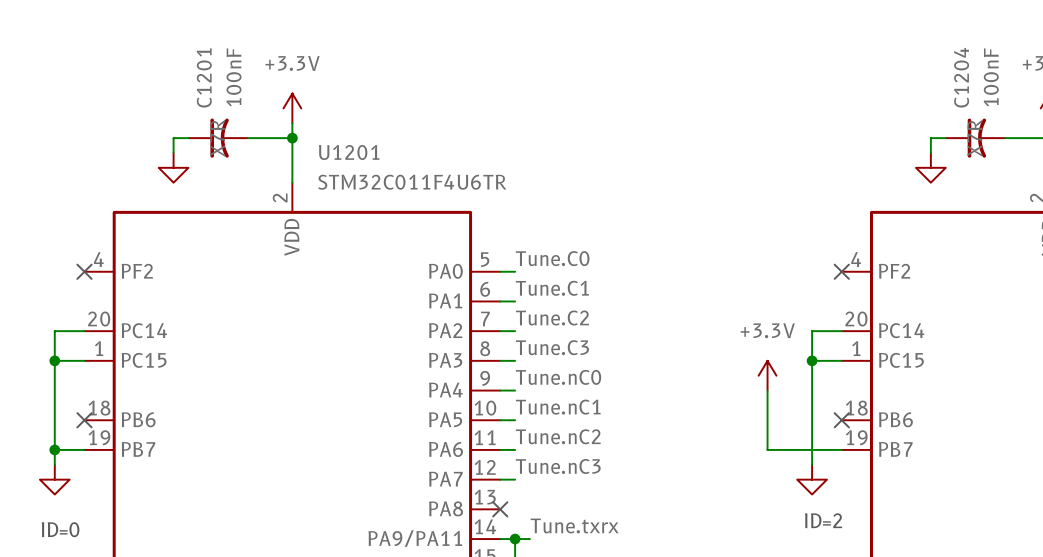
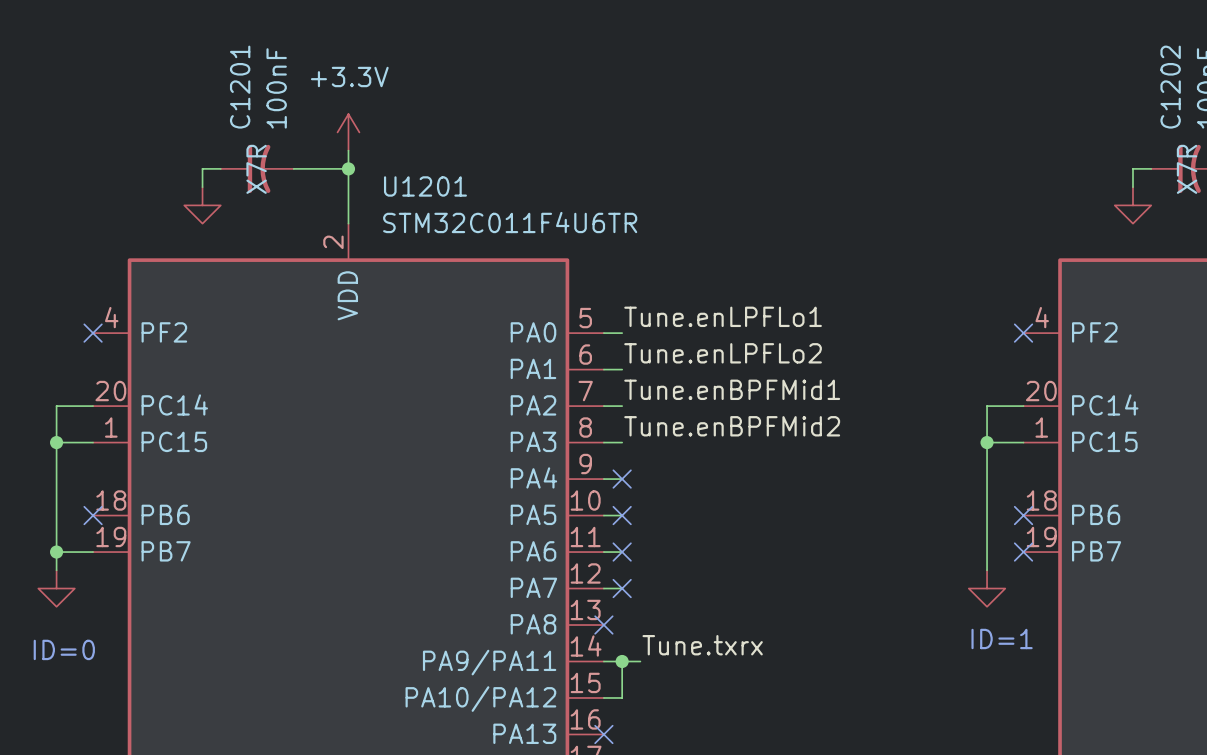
C1204 name: C1204 (961, 77) -> C1202 (1170, 87)
label: Tune.C0 (552, 258) -> Tune.enLPFLo1 (723, 316)
label: Tune.C1 (552, 288) -> Tune.enLPFLo2 (723, 353)
label: Tune.C2 (552, 318) -> Tune.enBPFMid1 (732, 389)
label: Tune.C3 (552, 347) -> Tune.enBPFMid2 (732, 426)
power symbol: +3.3V (767, 375) -> none
label: Tune.nC0 (558, 377) -> none
no-connect mark: none -> (622, 479)
wire: (767, 390) (767, 449) (841, 449) -> none
label: Tune.nC1 (558, 407) -> none
no-connect mark: none -> (622, 515)
label: Tune.nC2 (558, 436) -> none
no-connect mark: none -> (622, 552)
no-connect mark: none -> (1023, 552)
label: Tune.nC3 (558, 466) -> none
no-connect mark: none -> (622, 588)
text: ID=2 (823, 520) -> ID=1 (1002, 638)

